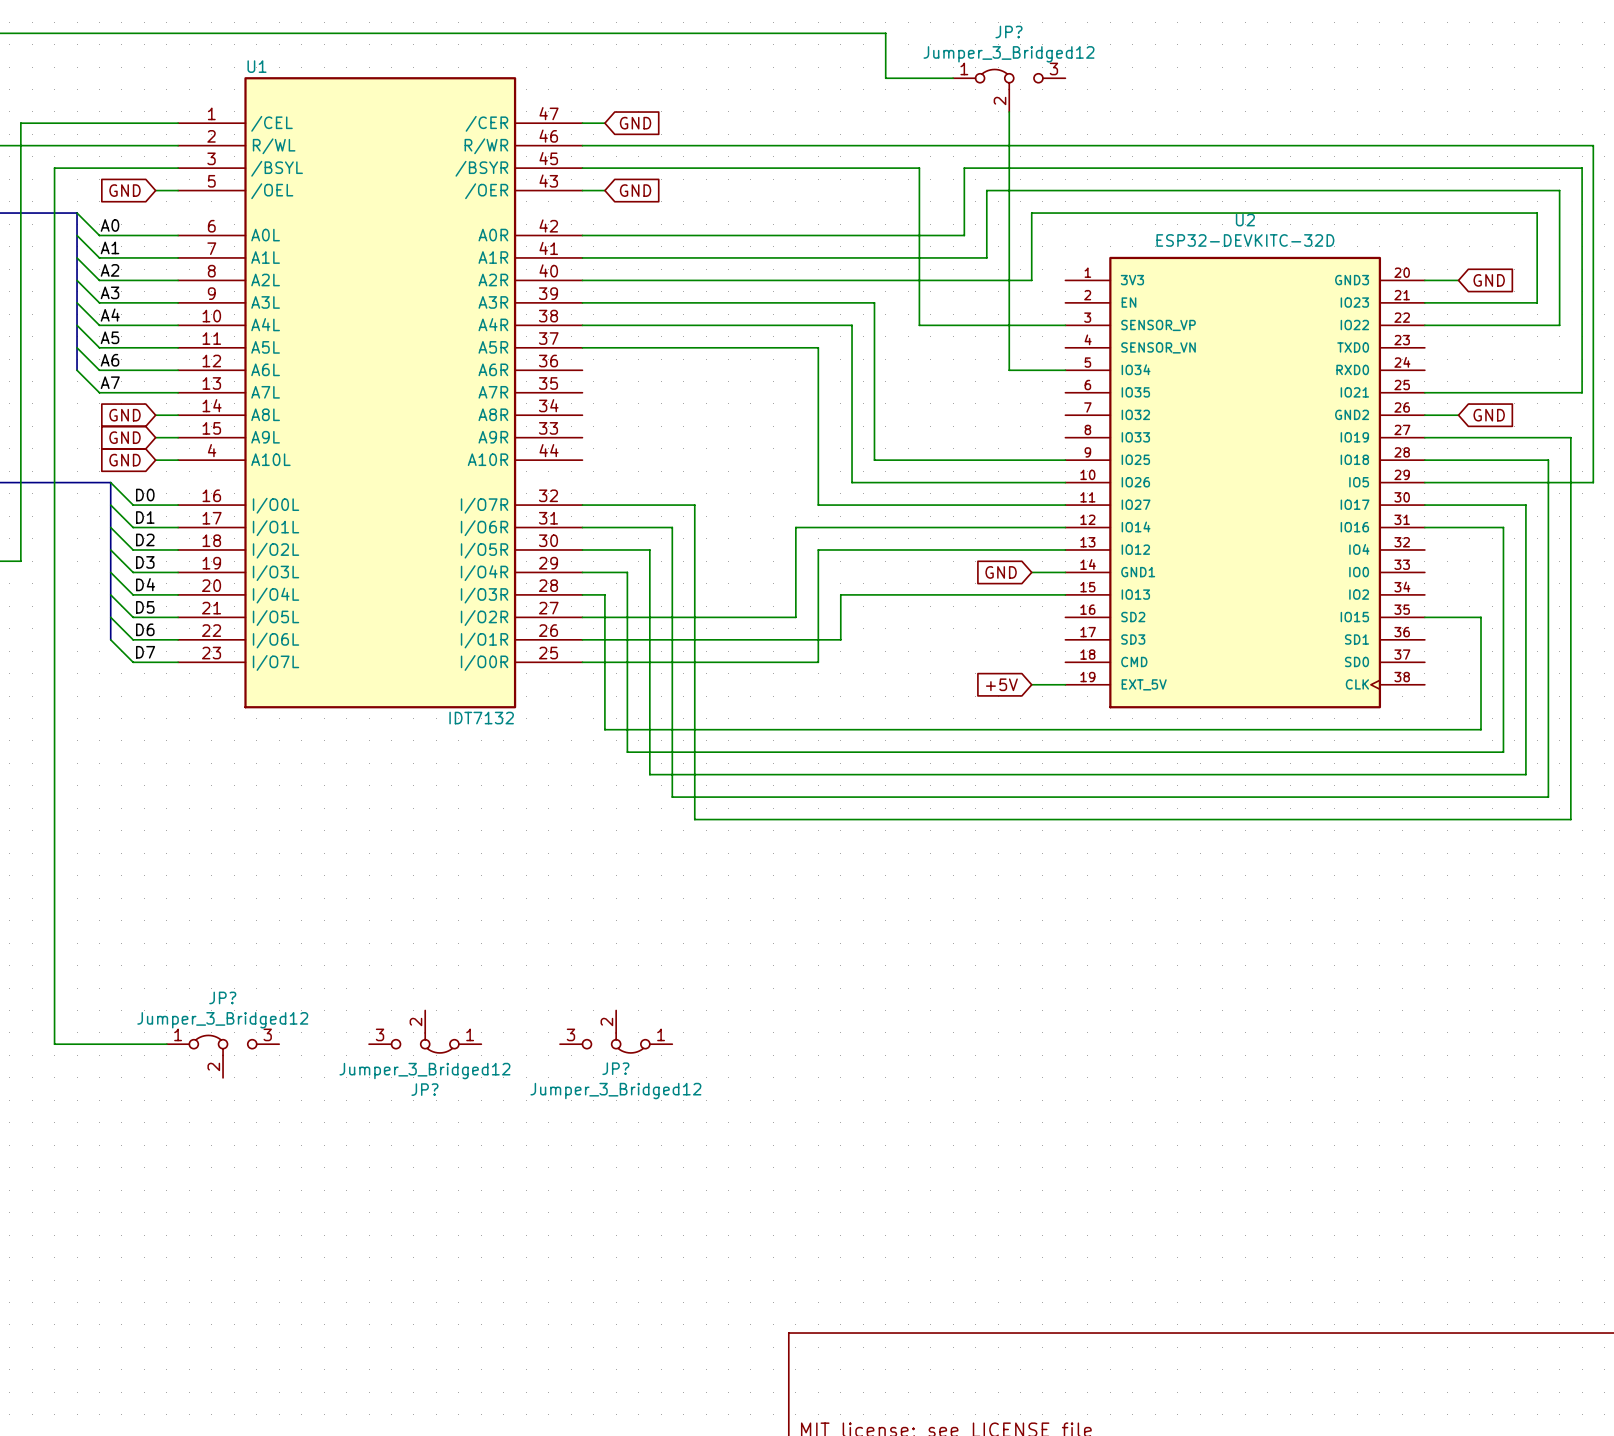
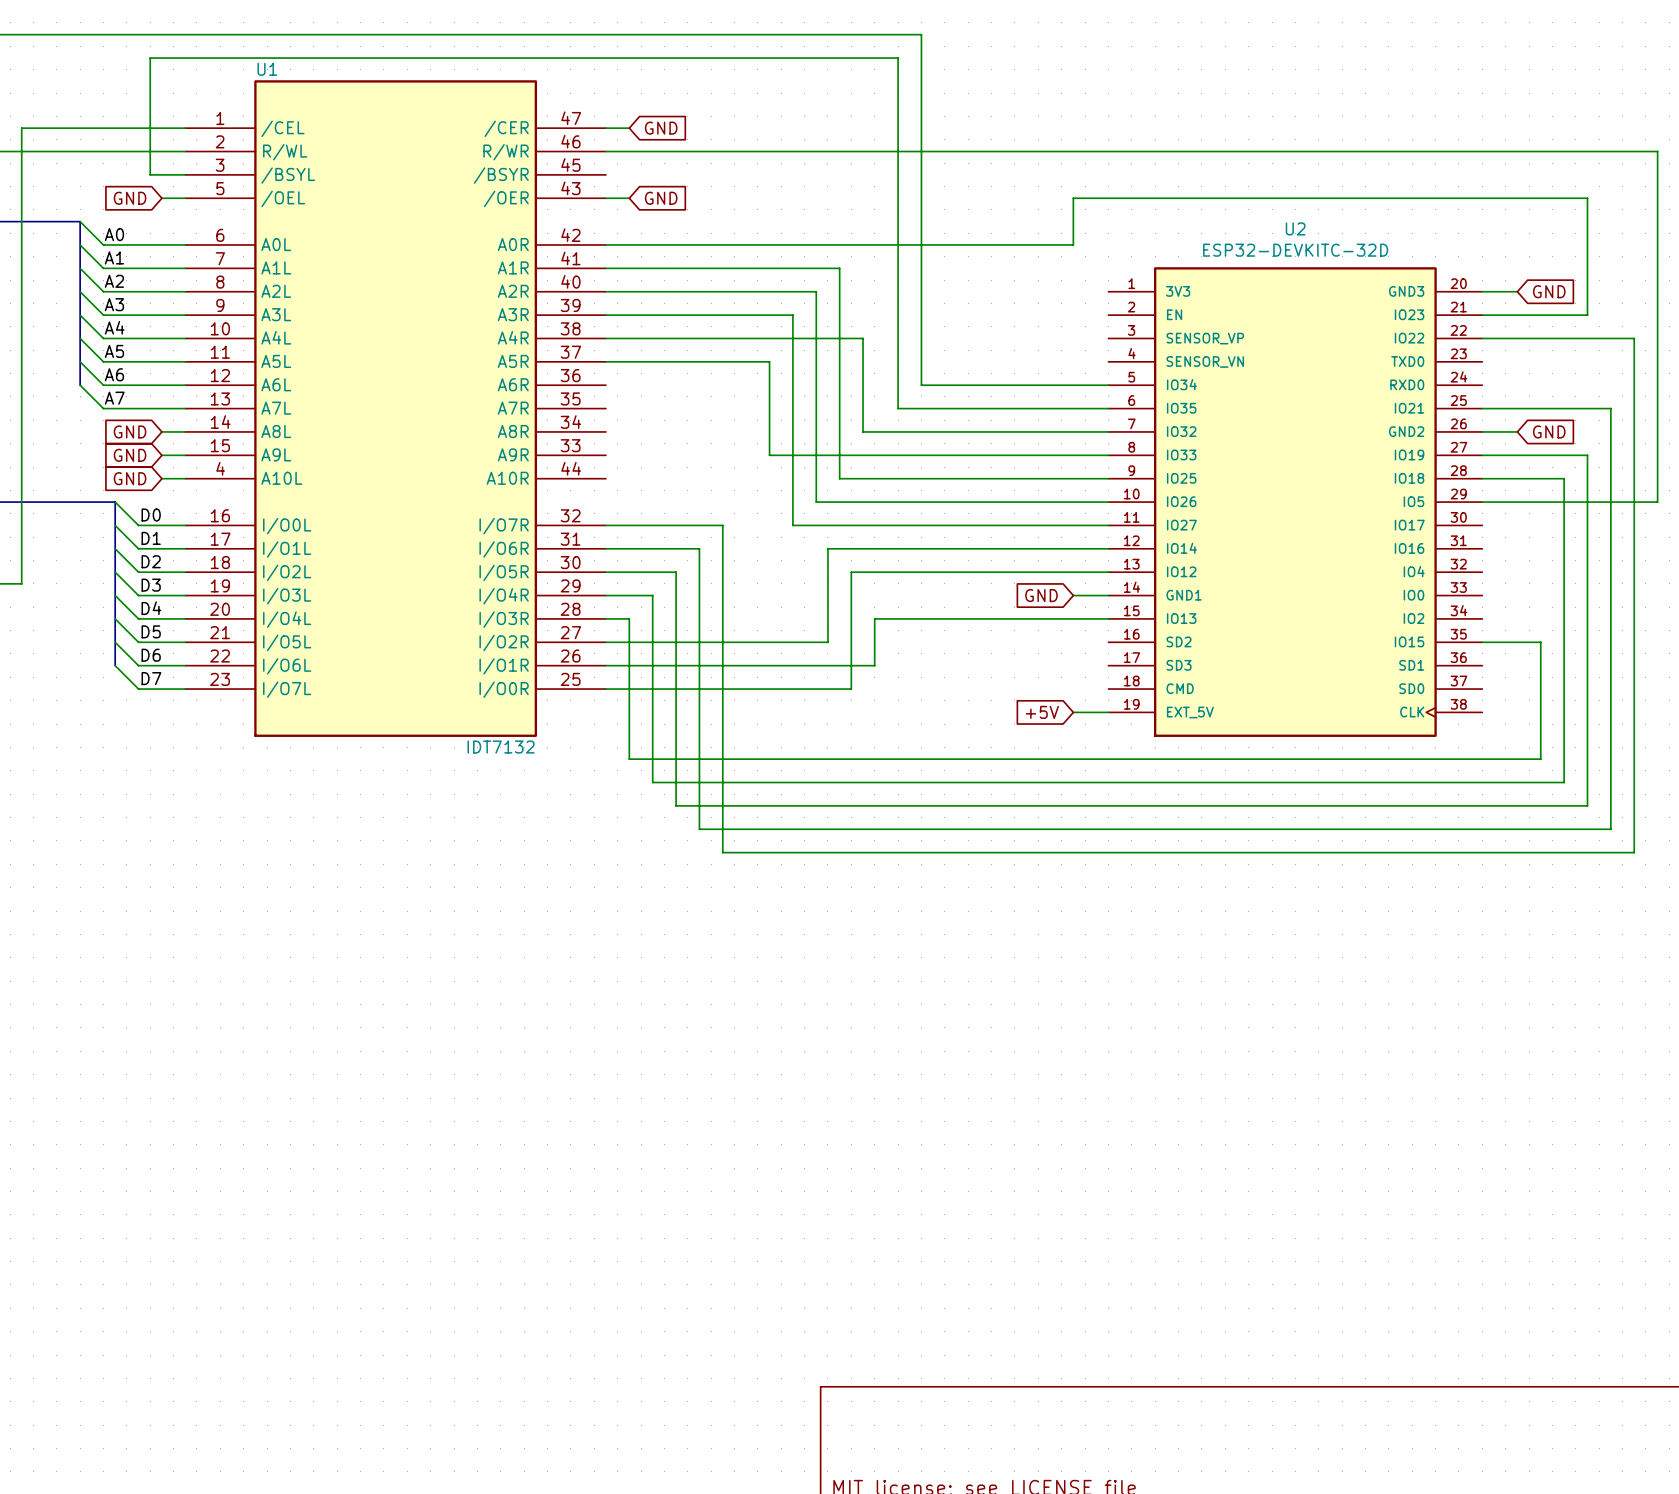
wire: (885, 78) (953, 78) -> none
JP?: Jumper_3_Bridged12 (1009, 90) -> none
wire: (1009, 111) (1009, 370) -> (921, 81) (921, 385) (1049, 385)
wire: (144, 168) (54, 168) (54, 1044) (166, 1044) -> (150, 174) (150, 58) (898, 58) (898, 408) (1108, 408)
wire: (582, 168) (919, 168) (919, 325) (1065, 325) -> none
wire: (1031, 190) (986, 190) (986, 257) (807, 257) -> (1073, 198) (1073, 221)
wire: (1525, 190) (1559, 190) (1559, 325) -> (1587, 198) (1587, 315)
wire: (1031, 213) (1537, 213) (1537, 302) (1525, 302) -> none
wire: (964, 235) (964, 168) (1582, 168) (1582, 392) (1548, 392) -> none
wire: (1031, 235) (1031, 280) (784, 280) -> (1073, 245) (1003, 245)
wire: (762, 302) (874, 302) (874, 460) -> (839, 268) (839, 478) (909, 478)
wire: (829, 325) (852, 325) (852, 482) -> (816, 291) (816, 502) (886, 502)
wire: none -> (863, 338) (863, 431) (1108, 431)
wire: none -> (1622, 338) (1634, 338) (1634, 455)
wire: (739, 347) (818, 347) (818, 505) -> (792, 315) (792, 525) (851, 525)
wire: none -> (769, 361) (769, 455) (1108, 455)
wire: (1525, 437) (1570, 437) -> (1587, 455) (1587, 525)
wire: (1503, 460) (1548, 460) -> (1610, 408) (1610, 478)
wire: (1424, 505) (1525, 505) -> none
wire: (1424, 527) (1503, 527) -> (1564, 478) (1564, 548)
JP?: Jumper_3_Bridged12 (425, 1031) -> none
JP?: Jumper_3_Bridged12 (616, 1031) -> none
JP?: Jumper_3_Bridged12 (223, 1056) -> none

